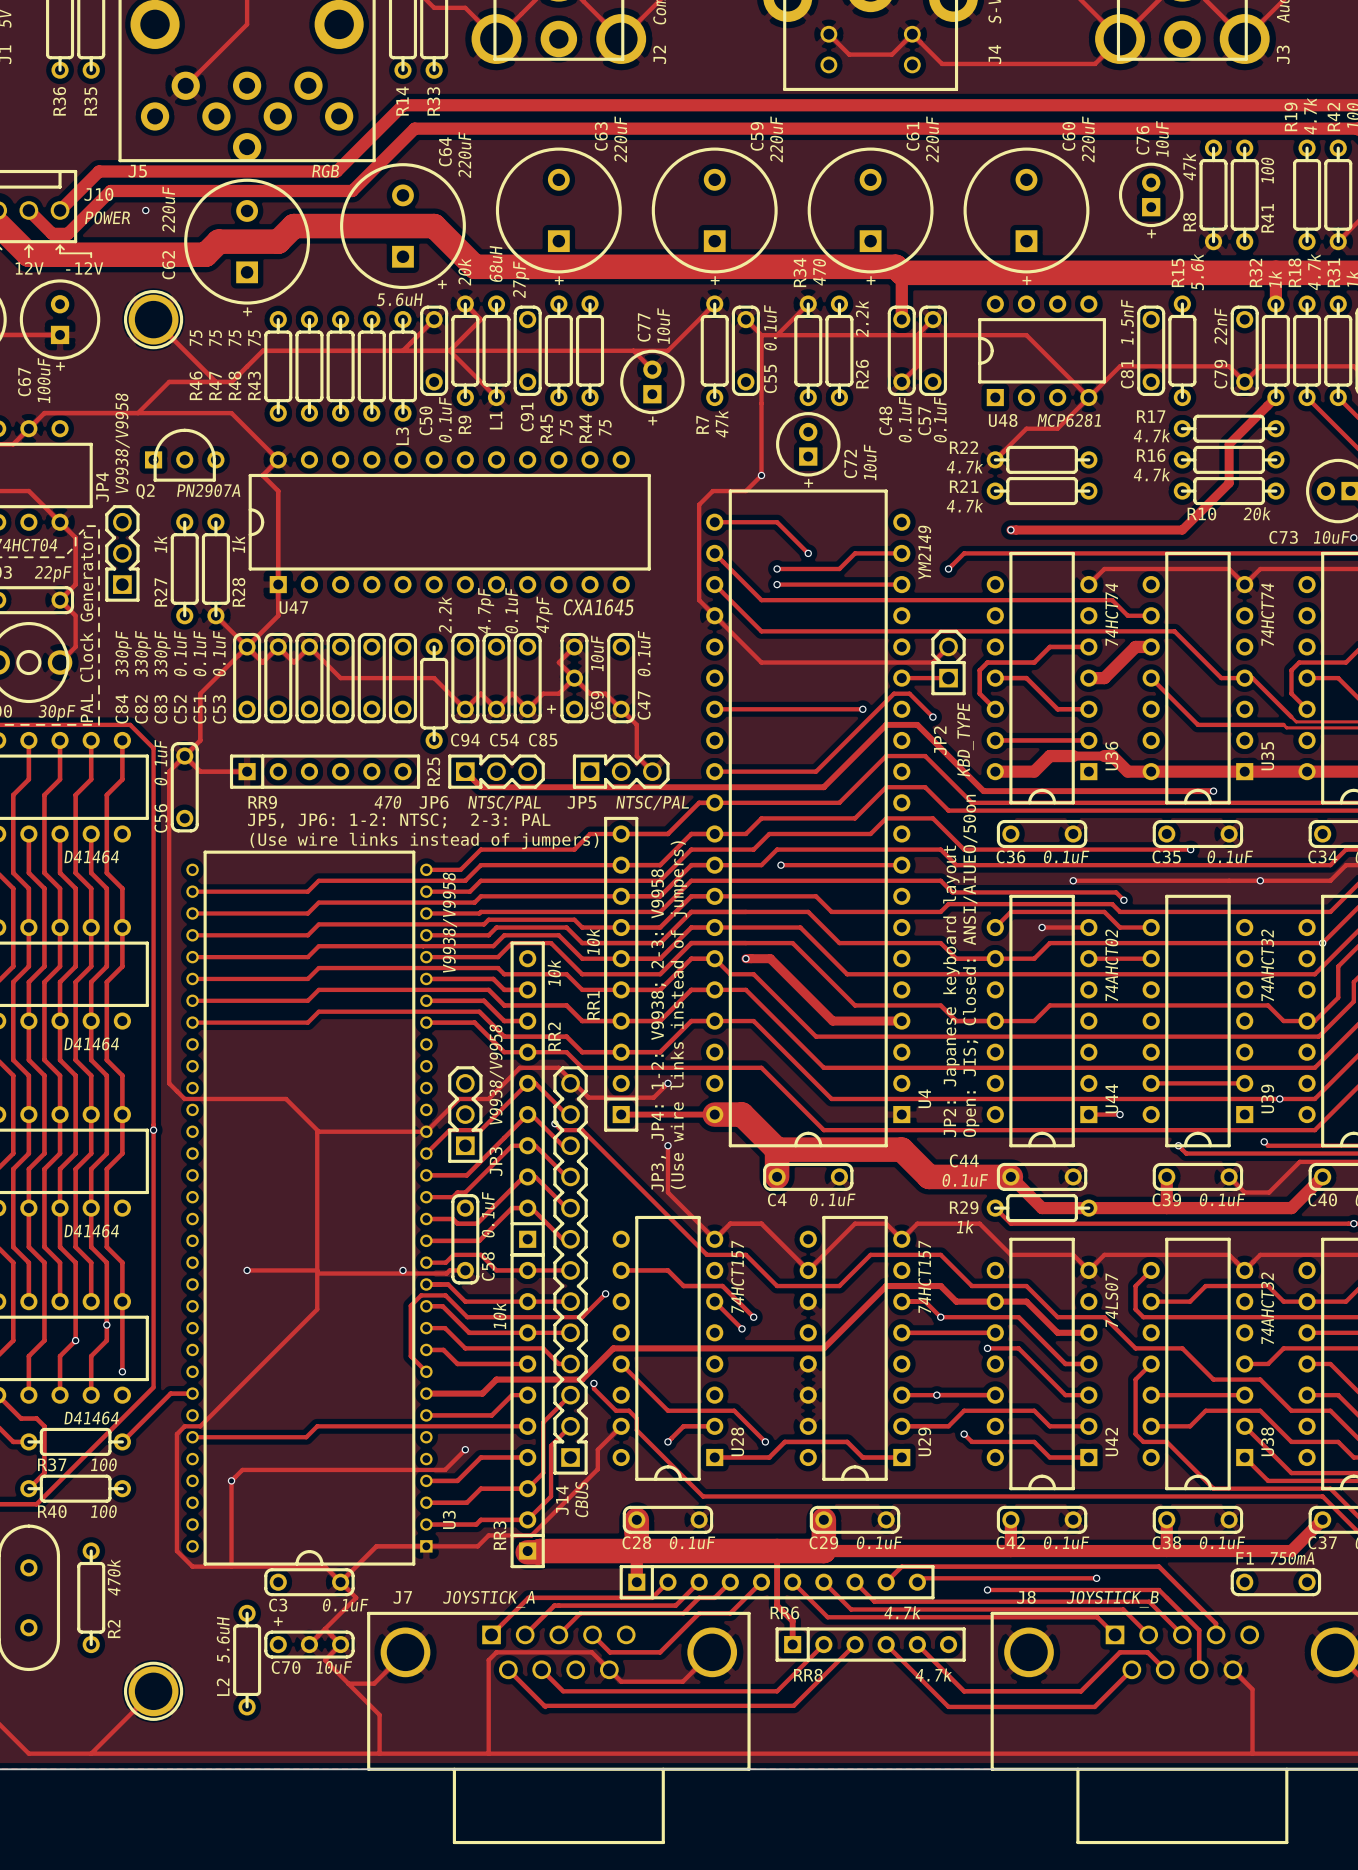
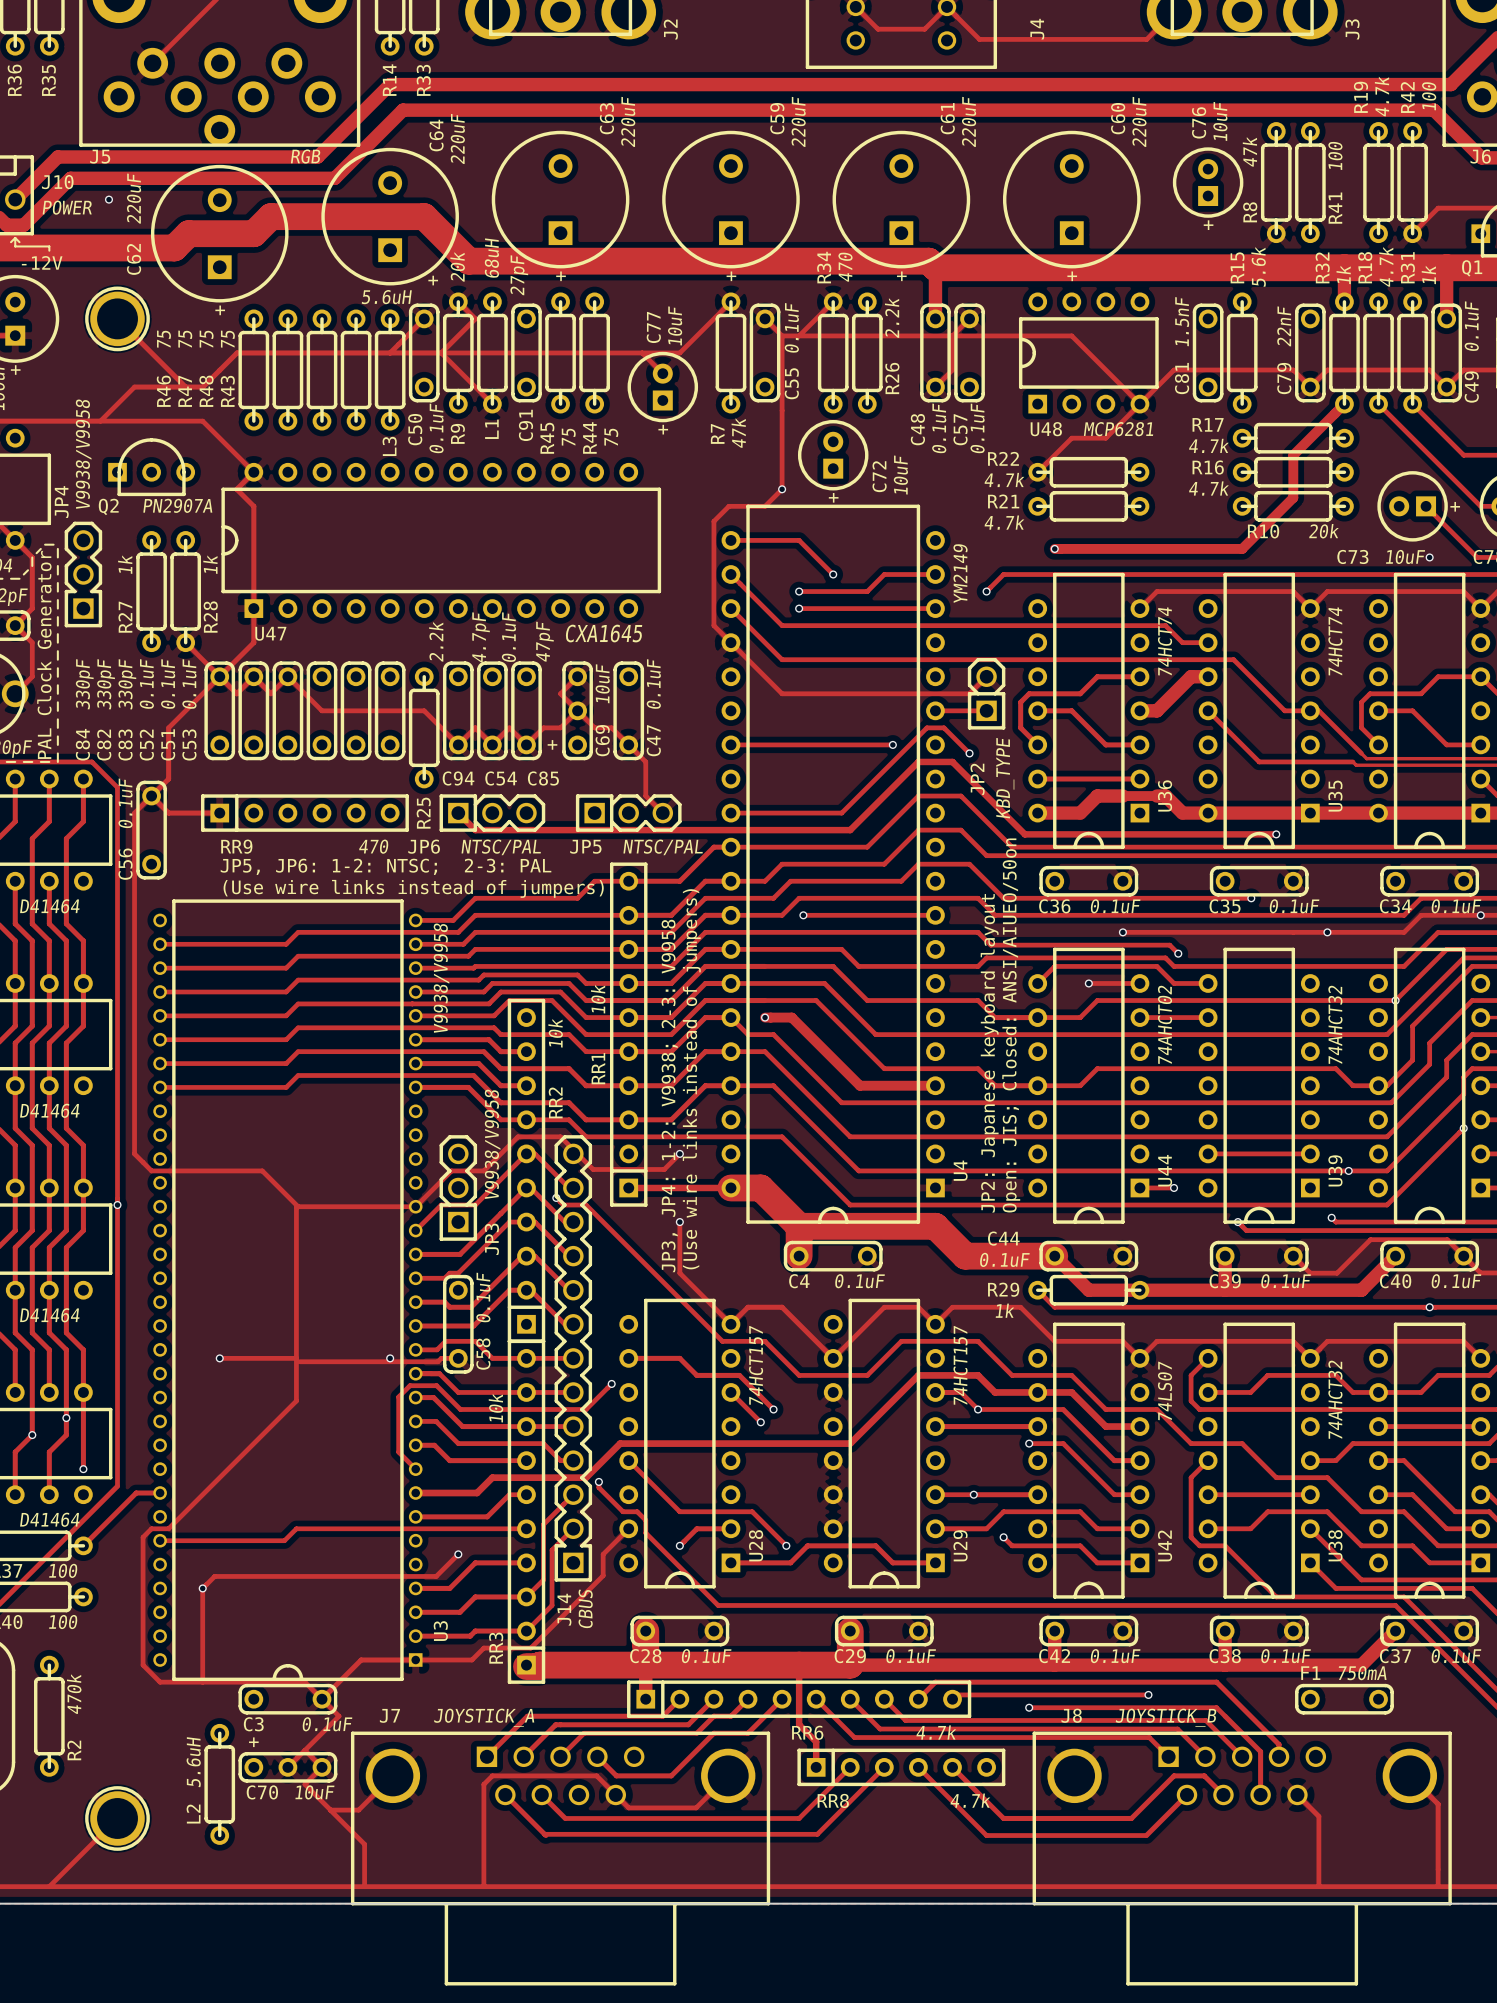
JP6 footprint: [448, 754, 545, 789] -> [439, 794, 546, 832]
JP5 footprint: [572, 754, 670, 789] -> [575, 794, 682, 832]
JP3 footprint: [448, 1066, 483, 1163] -> [439, 1135, 478, 1241]

